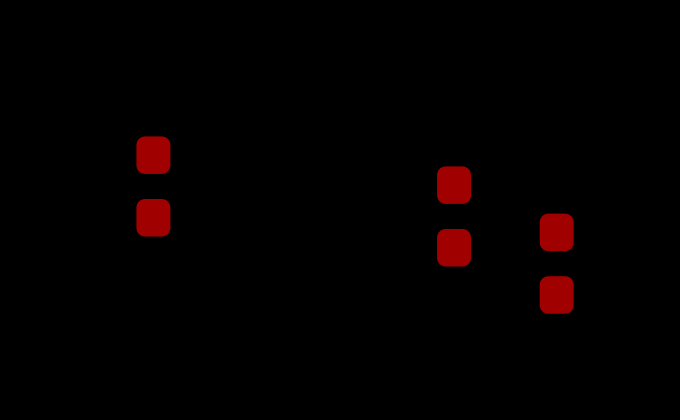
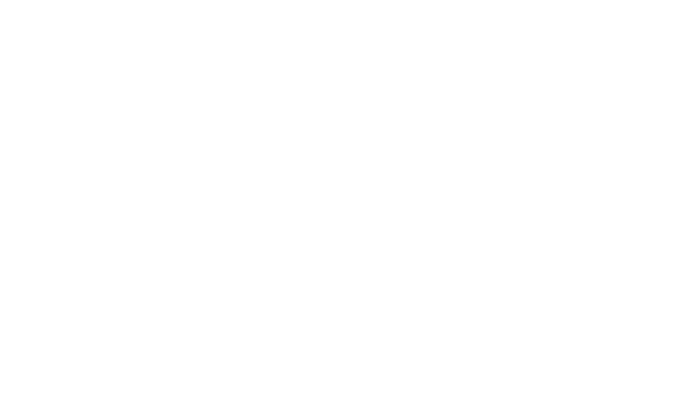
part: (153, 186) -> none
part: (454, 216) -> none
part: (556, 263) -> none

